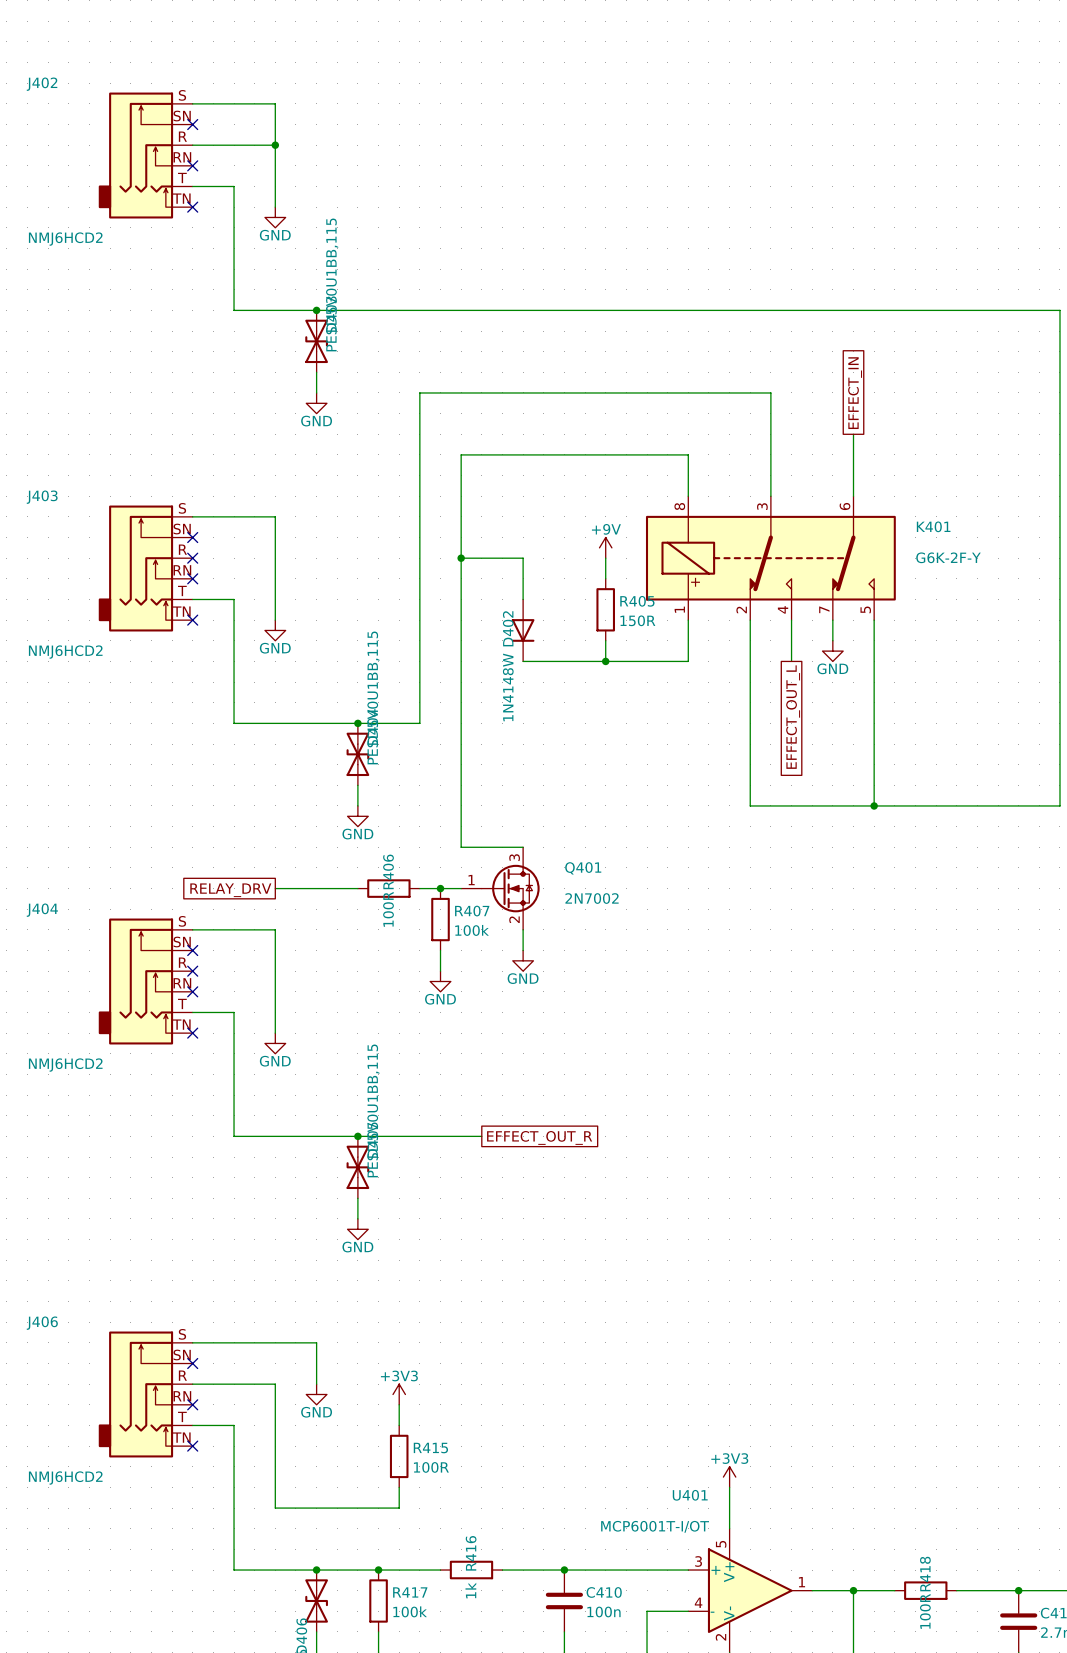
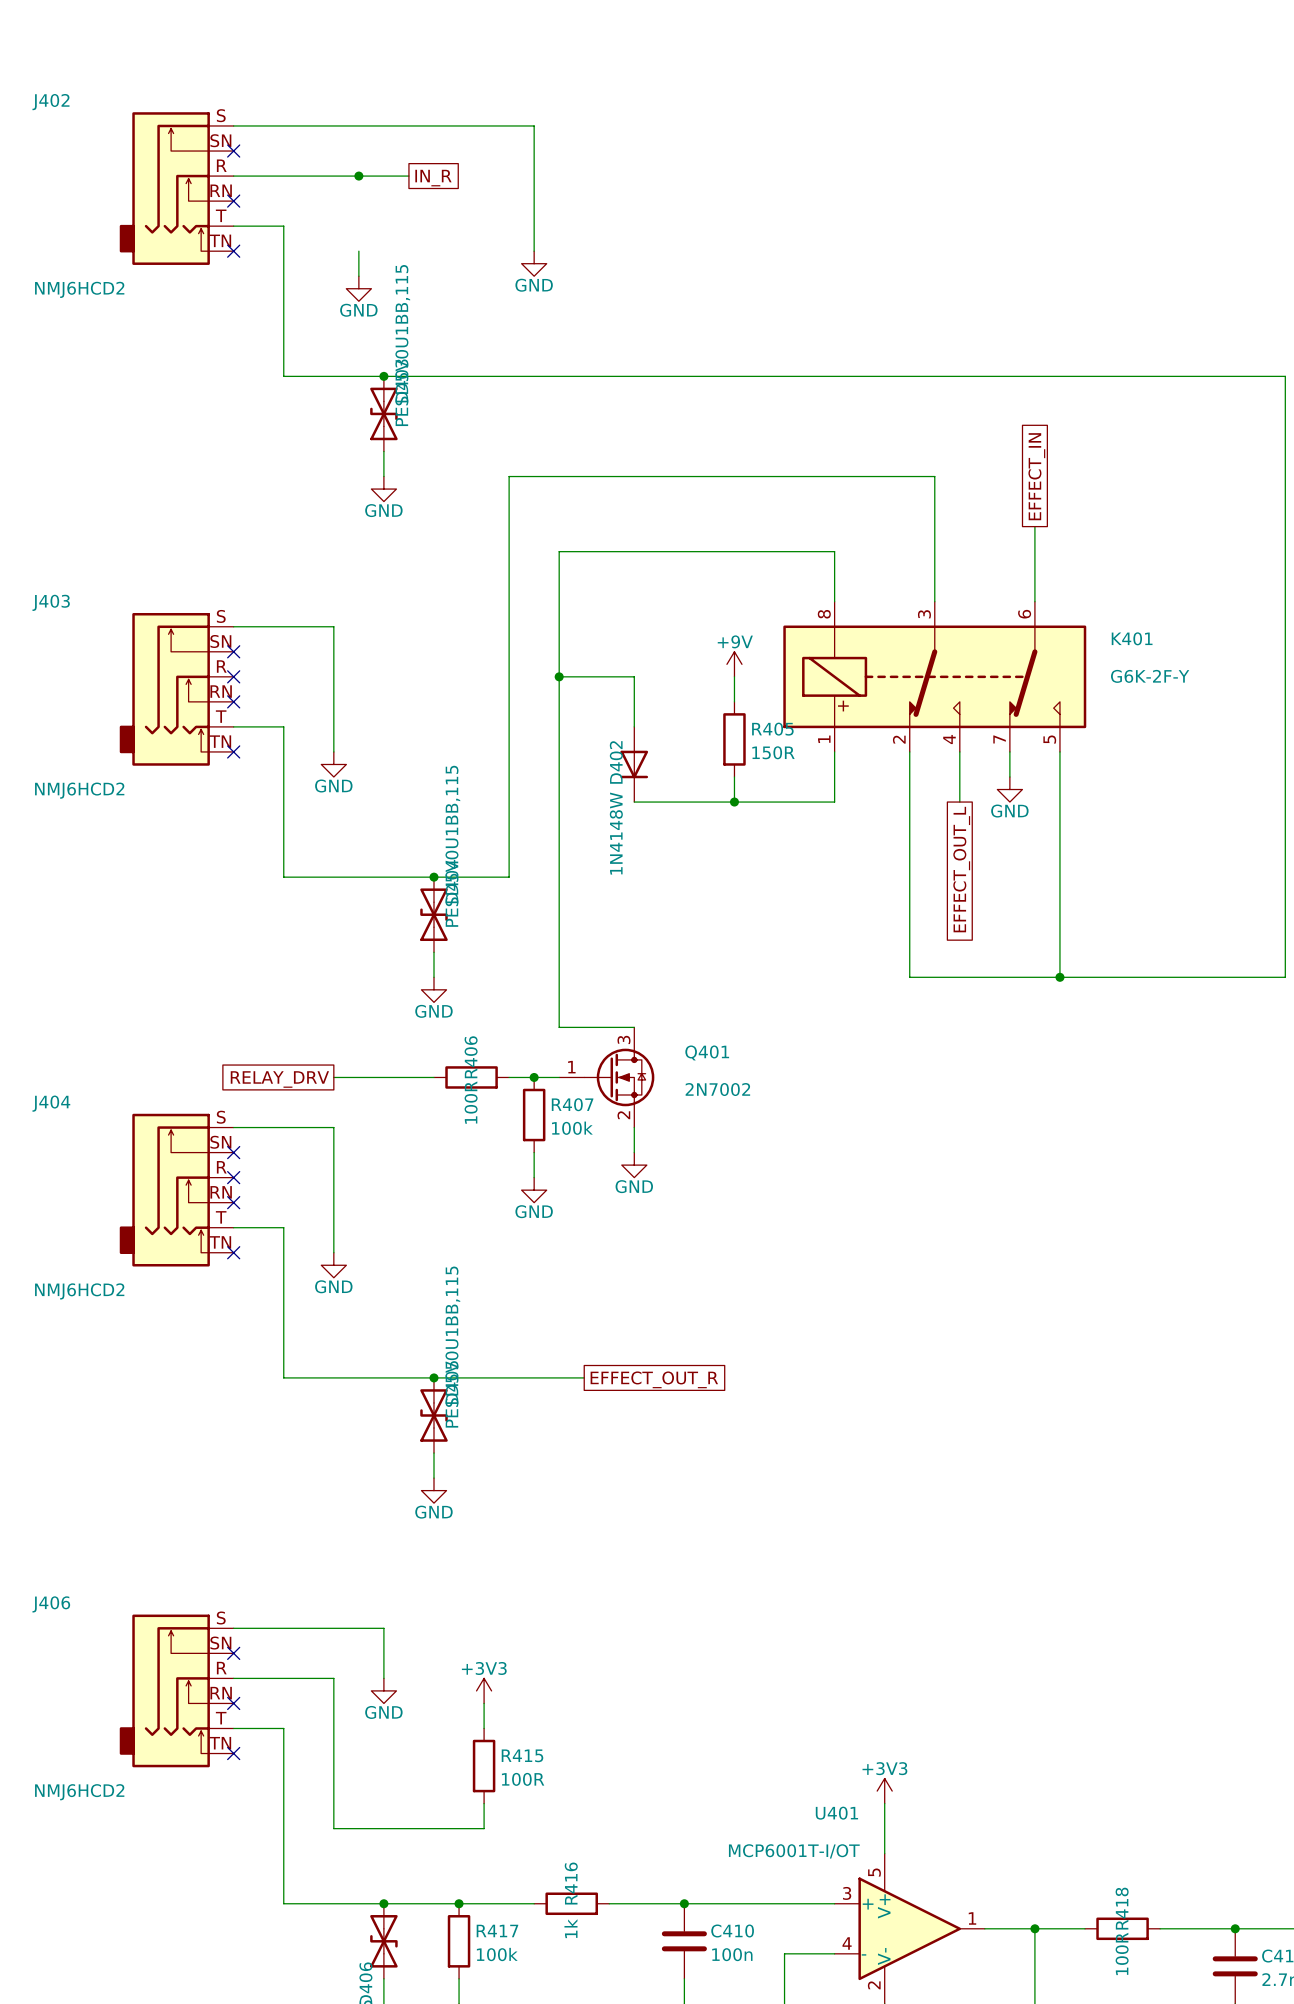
wire: (275, 103) (275, 207) -> (333, 125) (534, 125) (534, 251)
wire: none -> (333, 176) (408, 176)
junction position: (275, 145) -> (358, 176)
global label: none -> IN_R (433, 178)
wire: none -> (358, 251) (358, 276)
power symbol position: GND (275, 217) -> GND (358, 288)
power symbol: none -> GND (534, 263)

